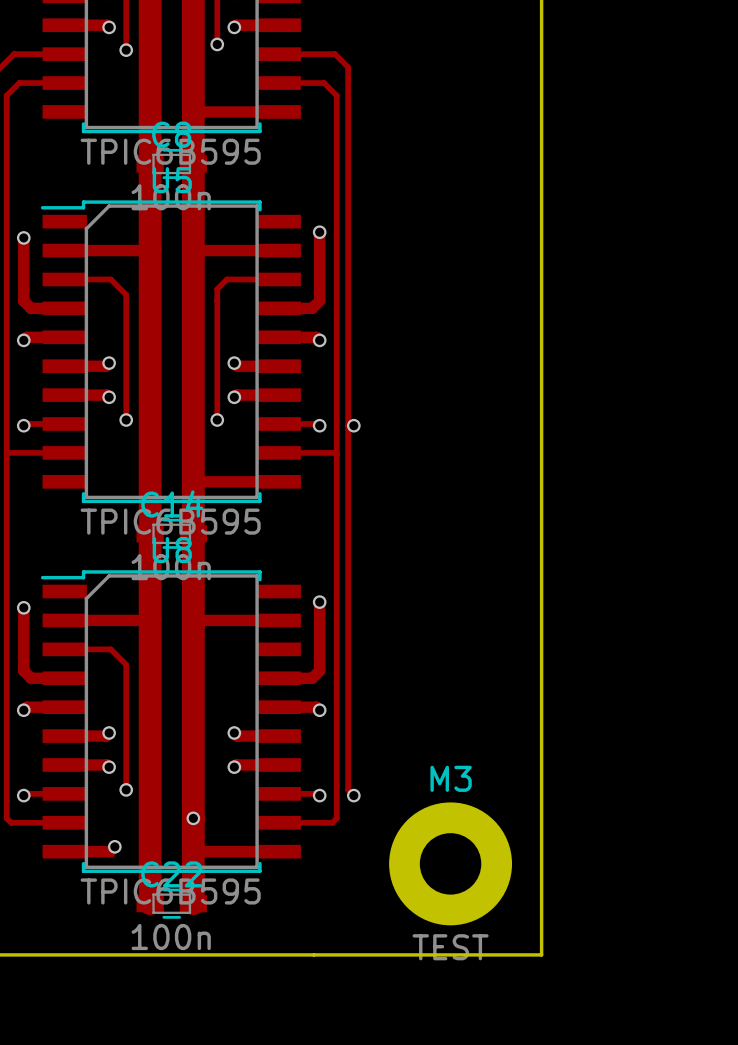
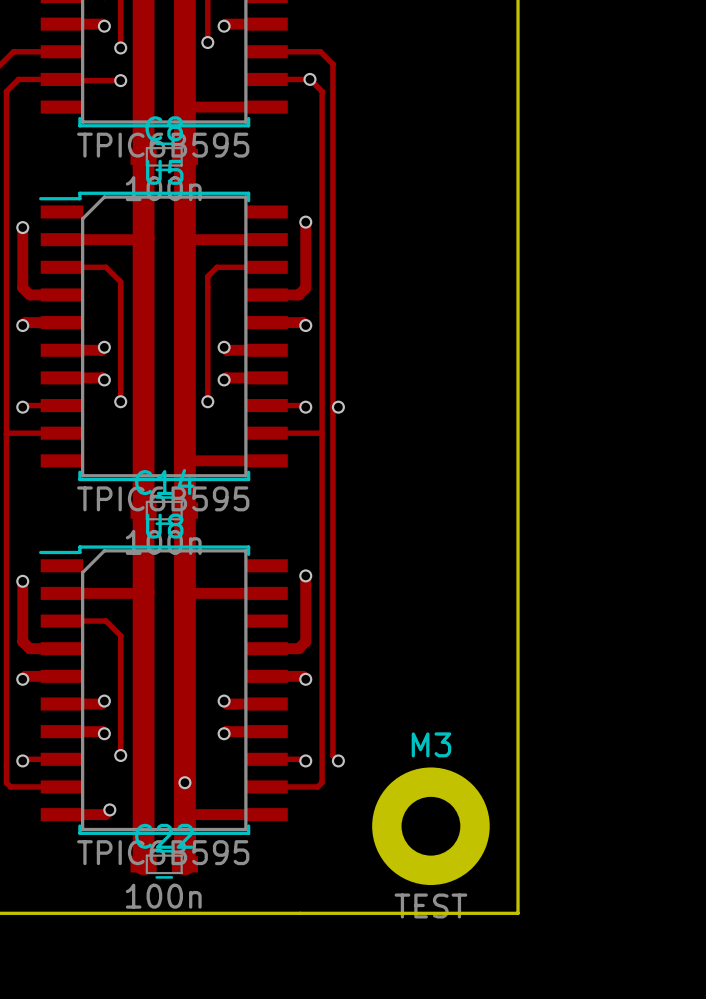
track: none -> (61, 79) (120, 80)
via: none -> (310, 79)
via: none -> (120, 80)

